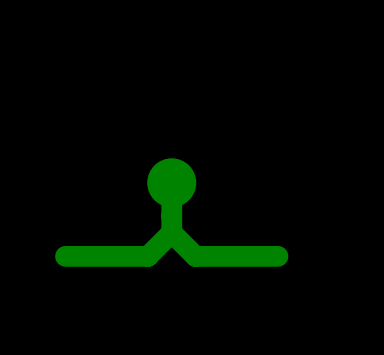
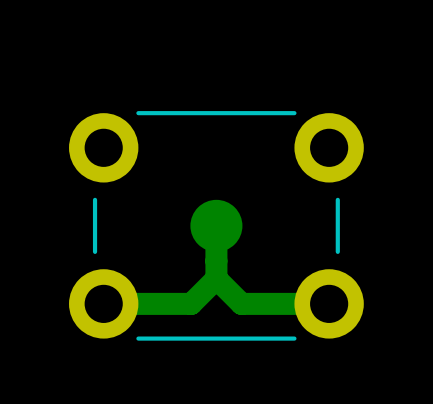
part: none -> (216, 225)

